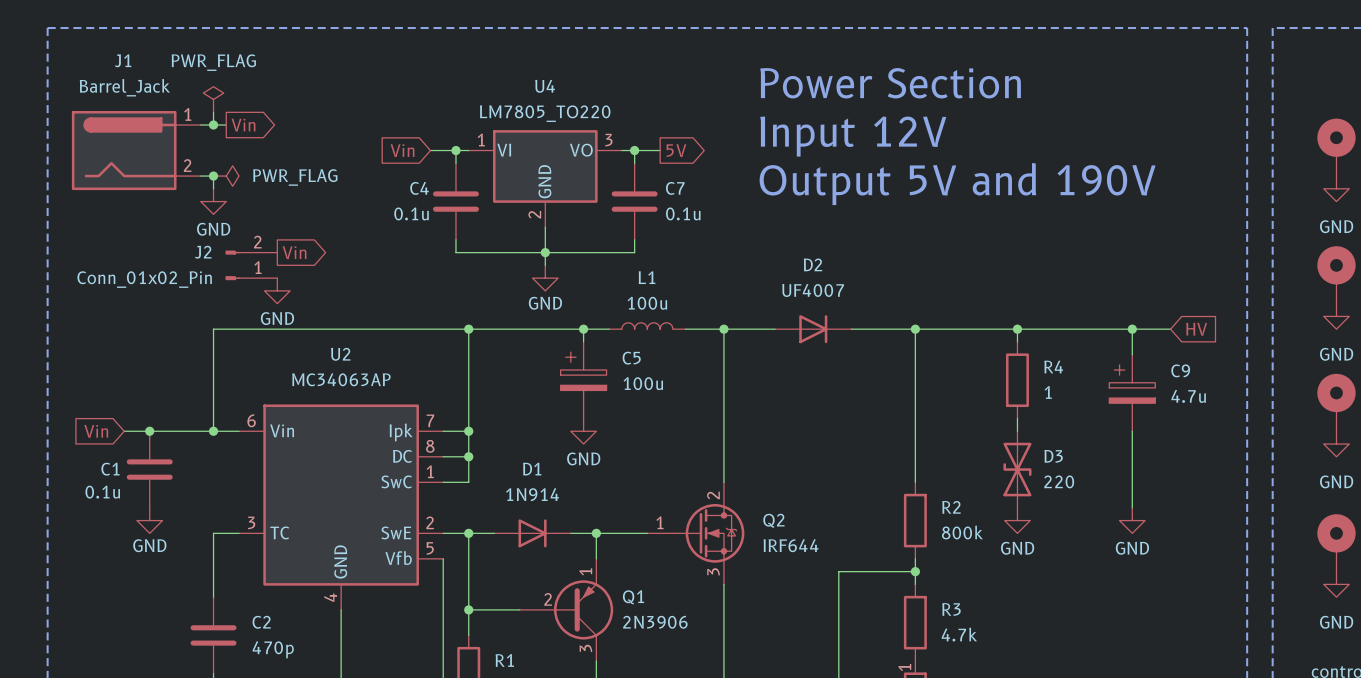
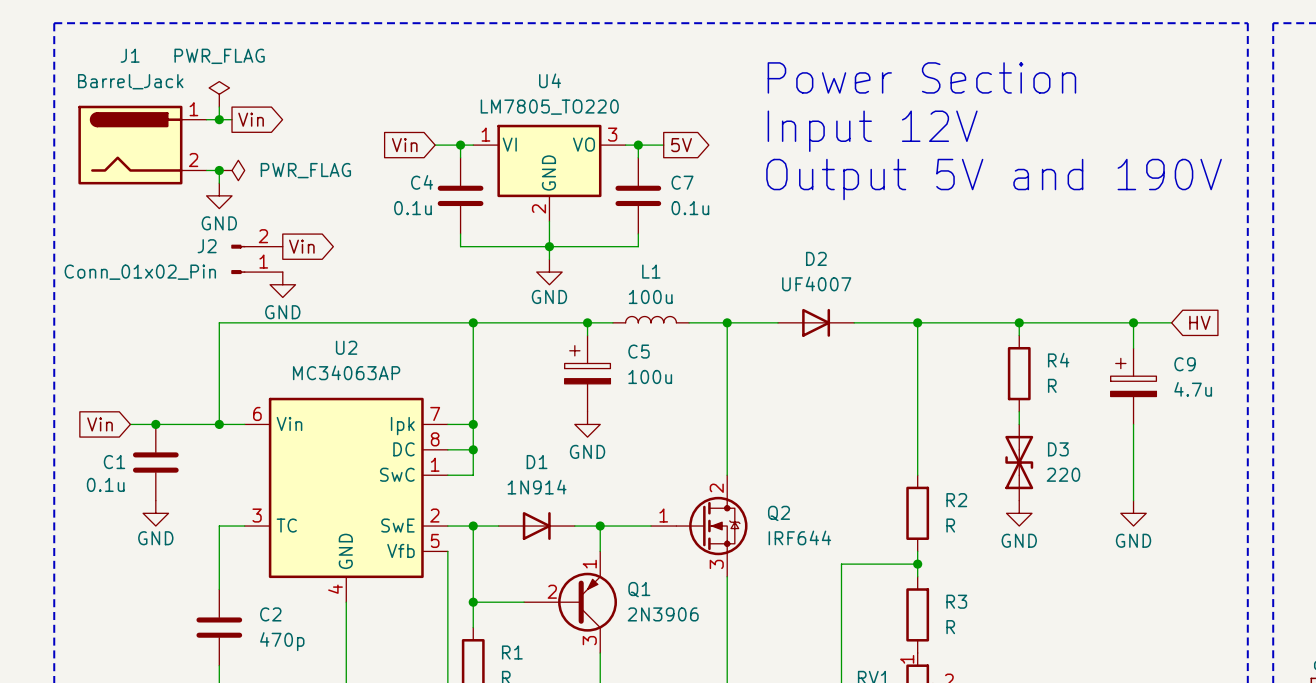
R4 value: 1 (1048, 392) -> R (1052, 385)
R2 value: 800k (962, 532) -> R (950, 525)
R3 value: 4.7k (959, 634) -> R (950, 627)

